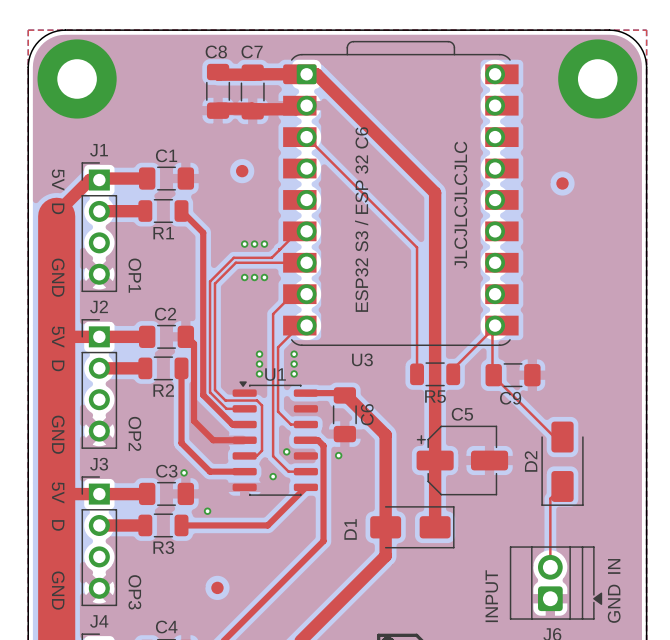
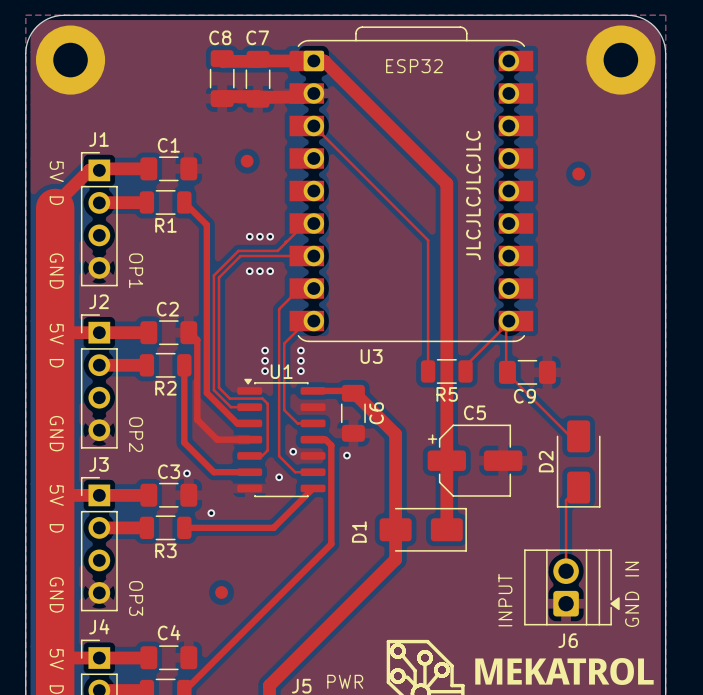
part footprint: [37, 39, 117, 119] -> [35, 25, 106, 95]
part footprint: [558, 39, 638, 119] -> [586, 25, 656, 95]
text: none -> ESP32 (414, 66)
text: ESP32 S3 / ESP 32 C6 (361, 219) -> none

